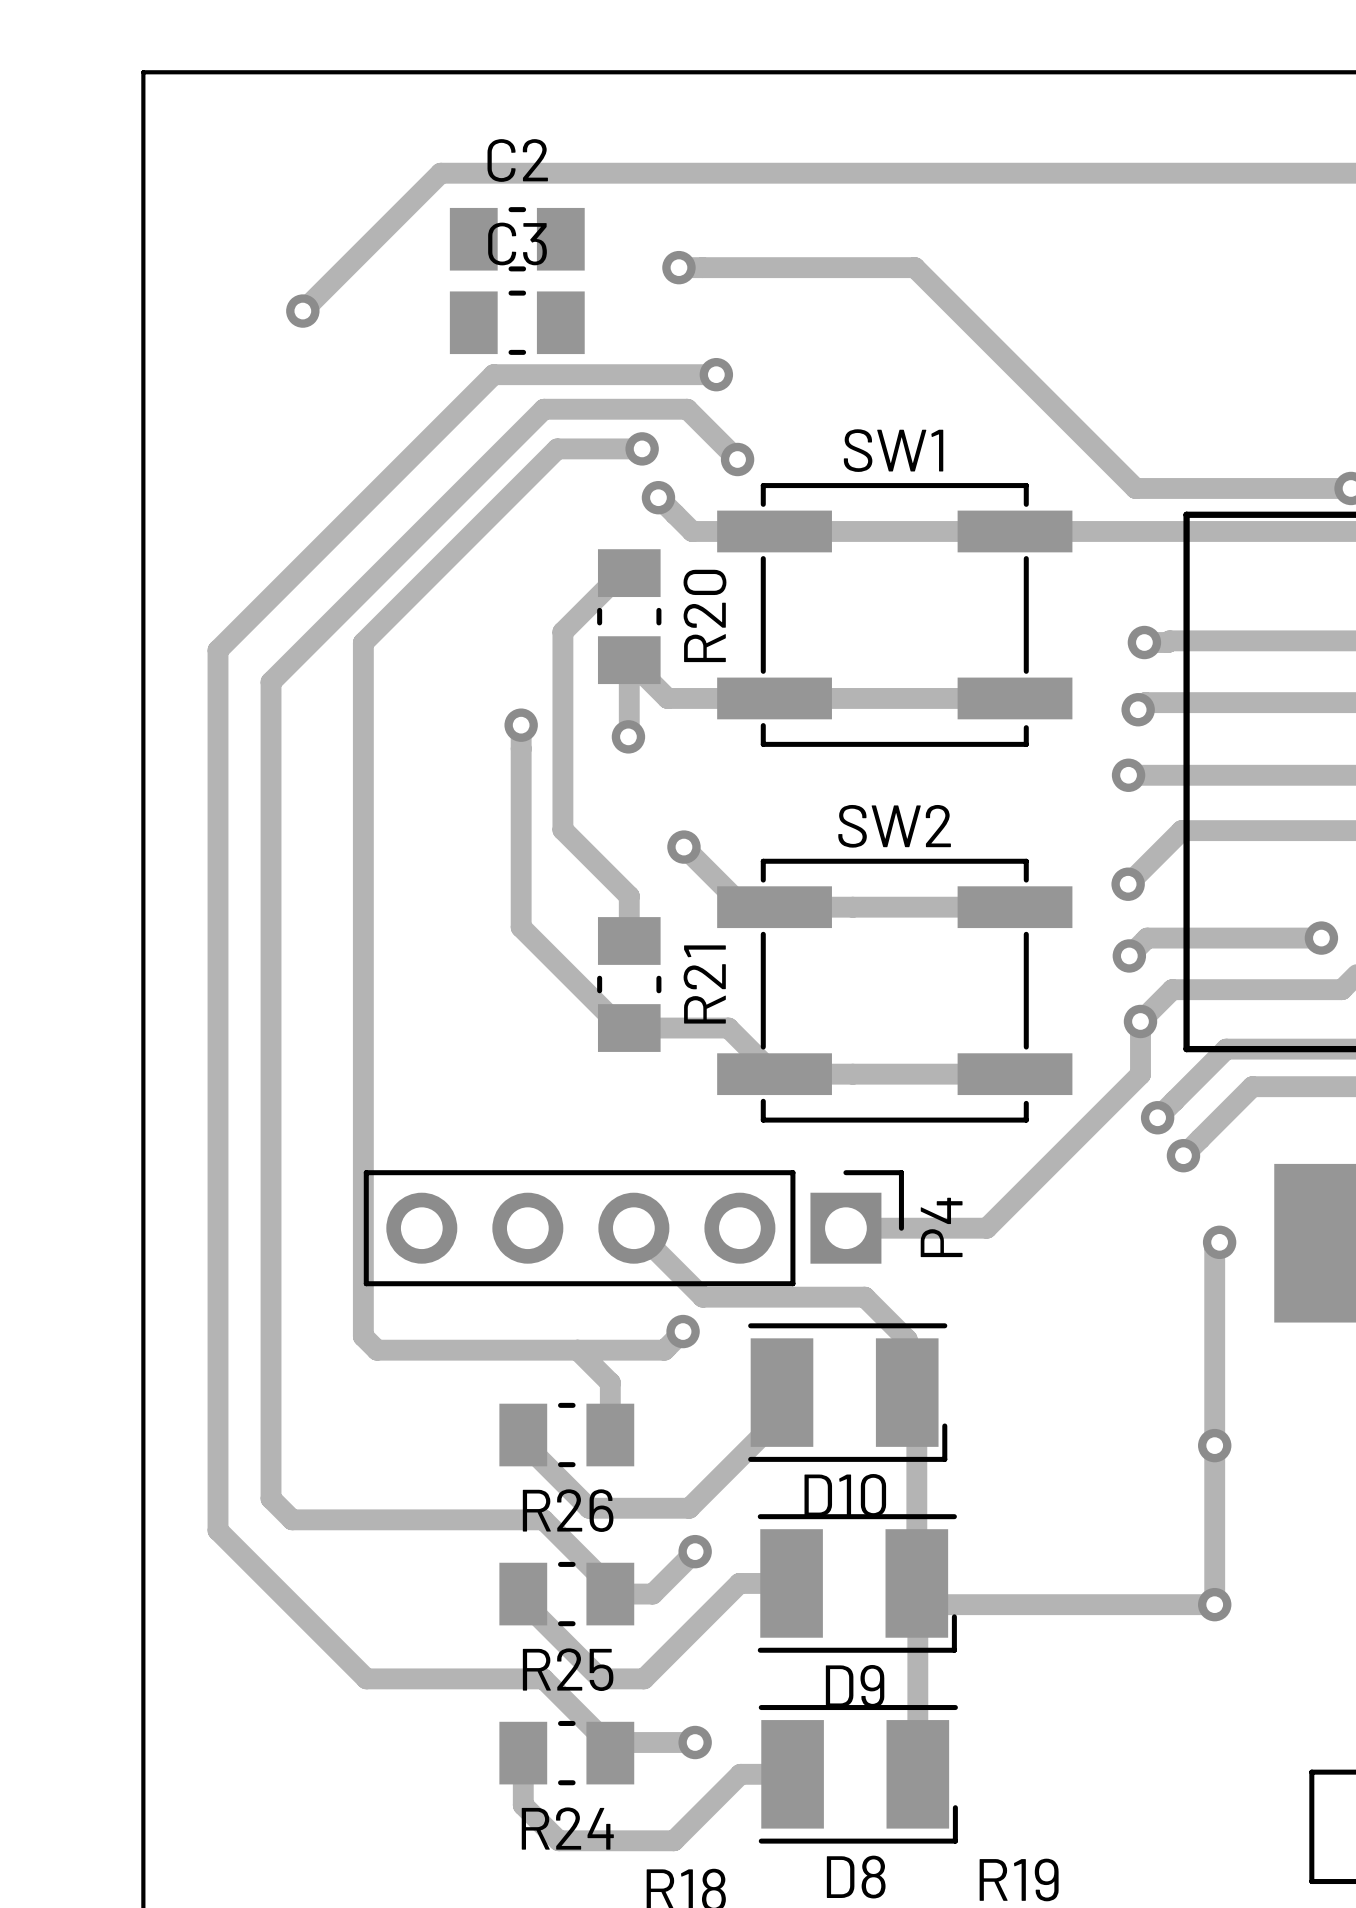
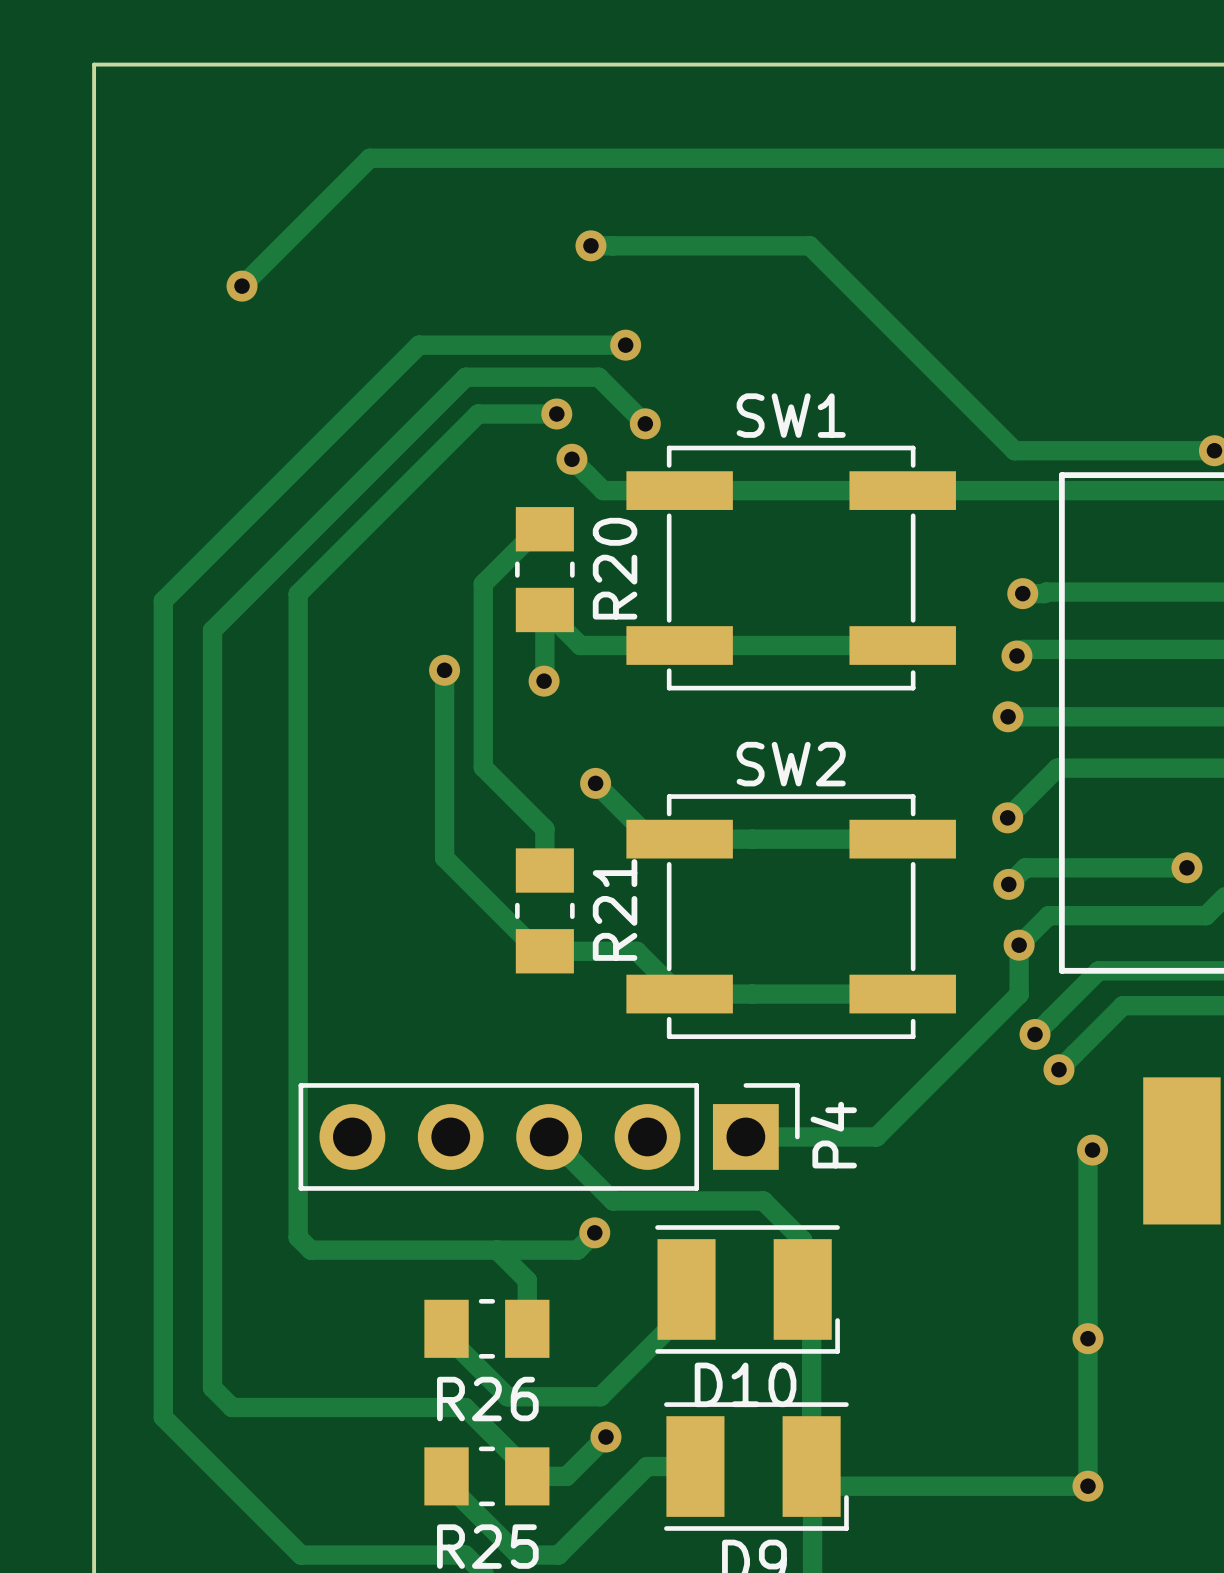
C2: (517, 239) -> none
C3: (517, 322) -> none

